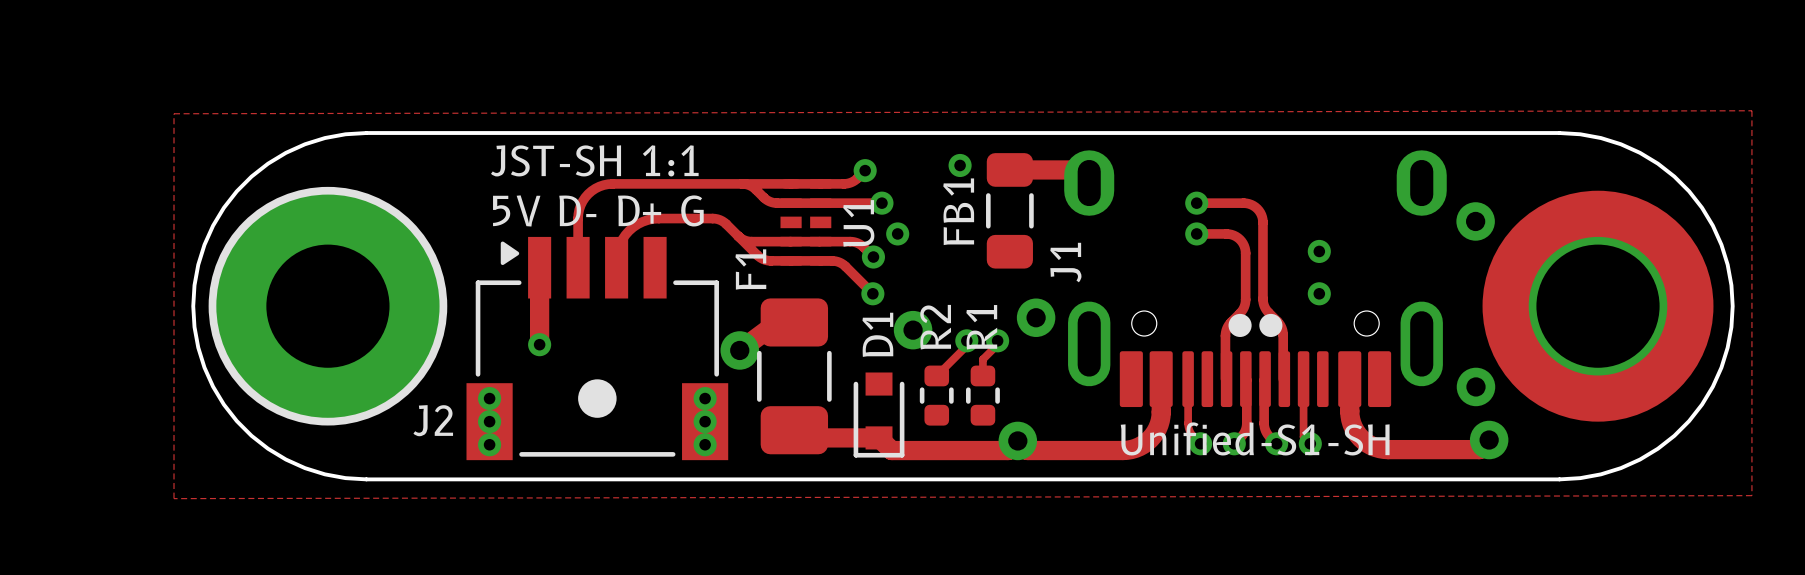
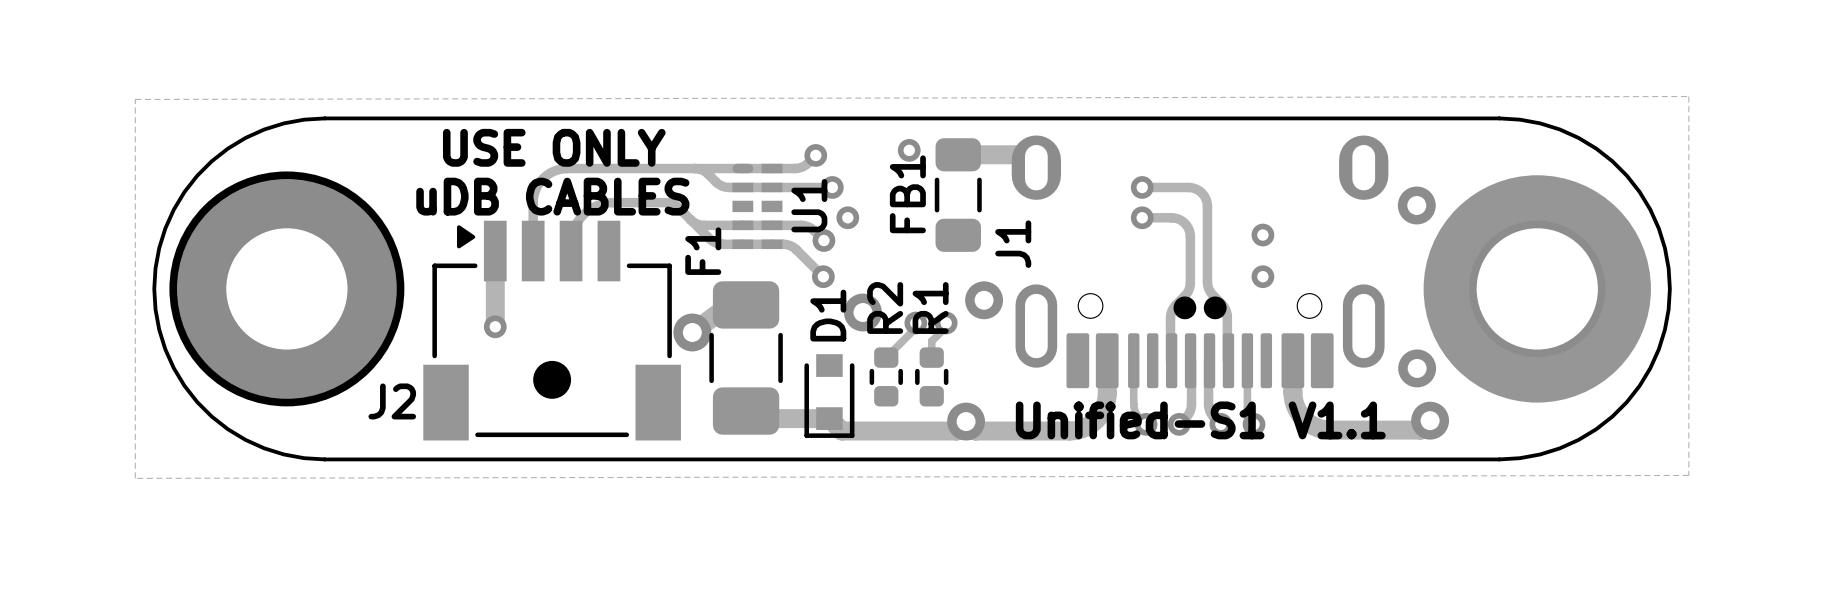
text: JST-SH 1:1 (594, 160) -> USE ONLY (554, 147)
text: 5V D- D+ G (598, 210) -> uDB CABLES (552, 196)
J2 footprint: [466, 236, 729, 461] -> [423, 220, 681, 441]
text: Unified-S1-SH (1255, 438) -> Unified-S1 V1.1 (1200, 420)

